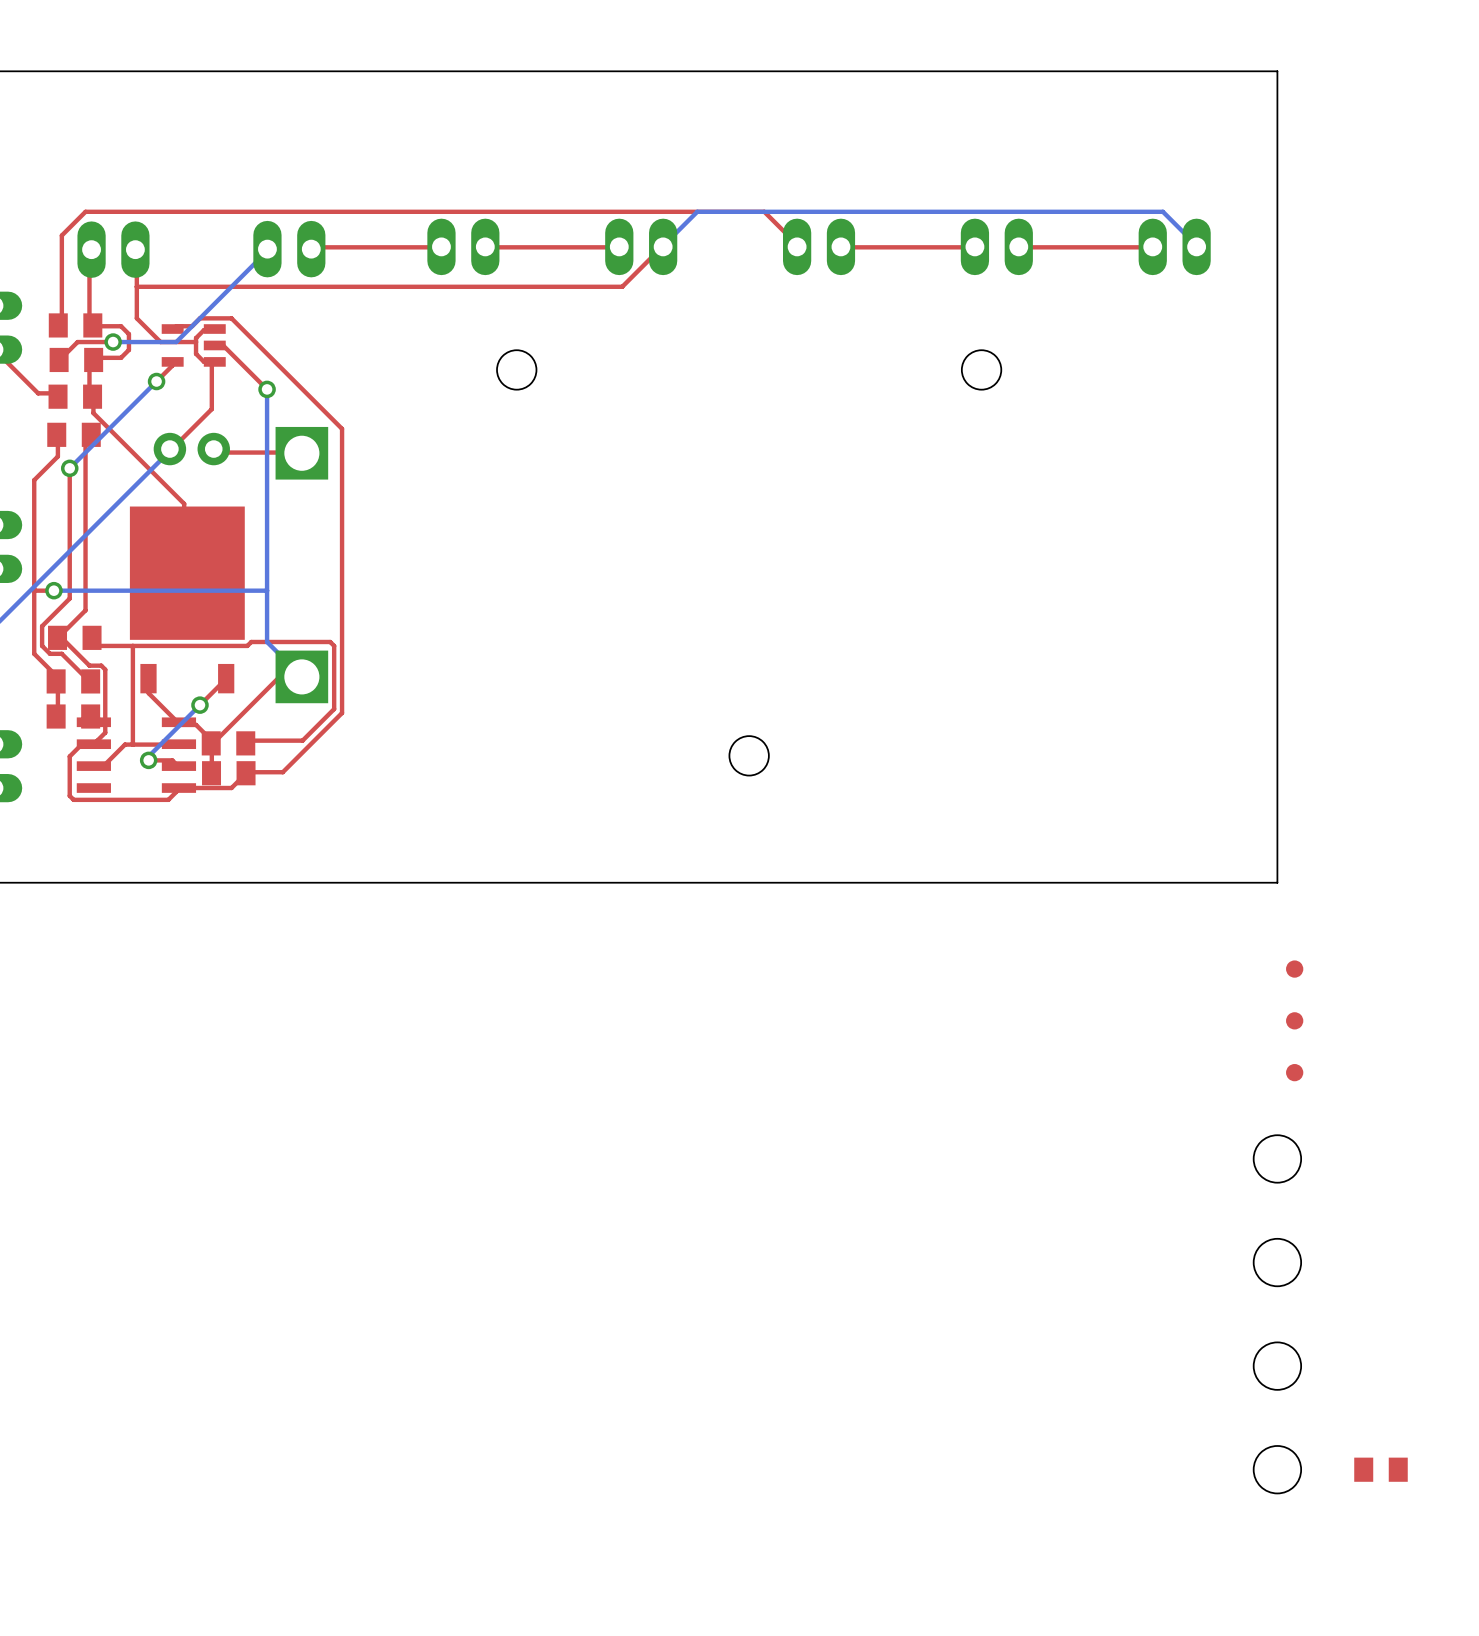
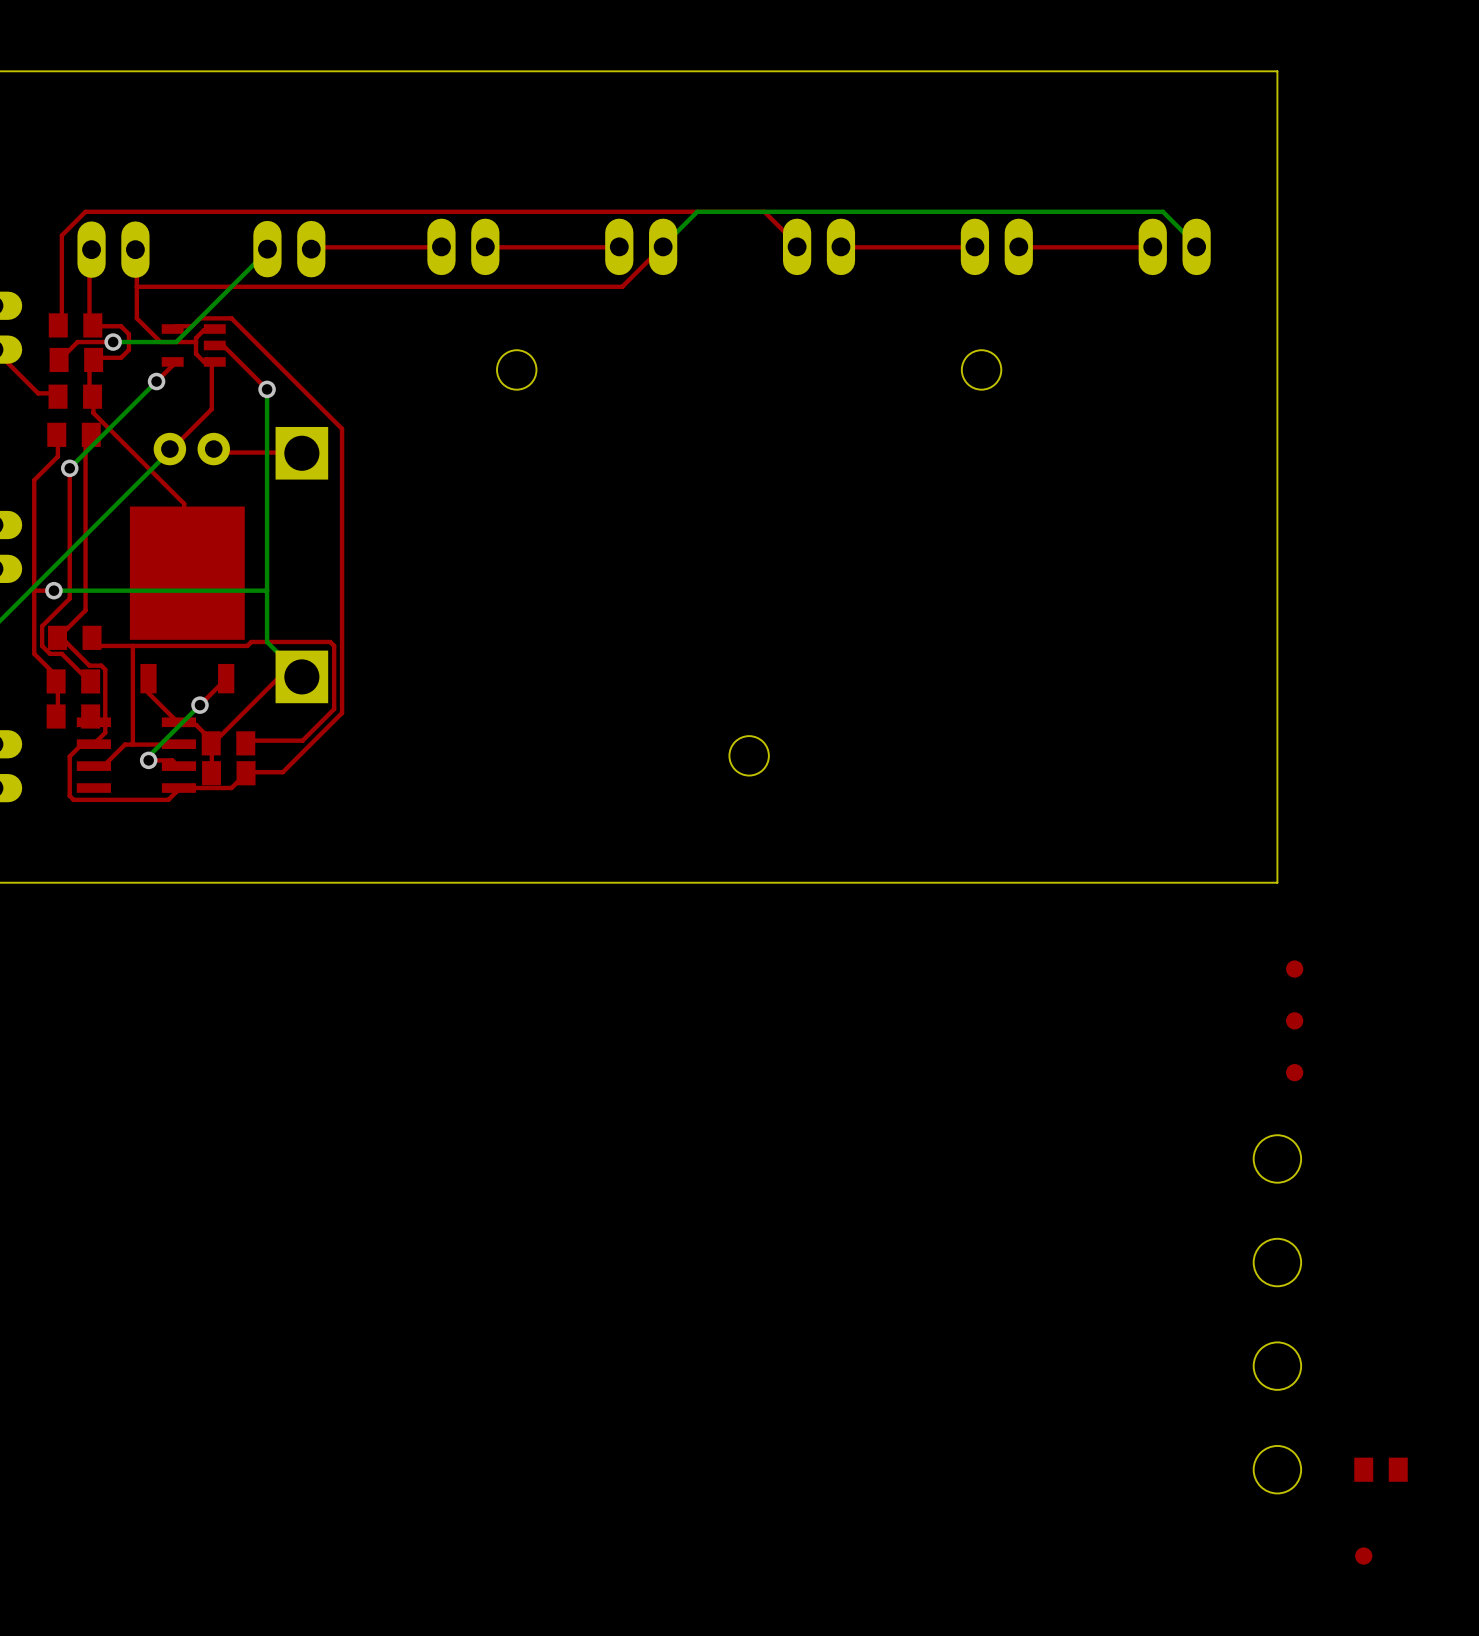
part: none -> (1363, 1556)

